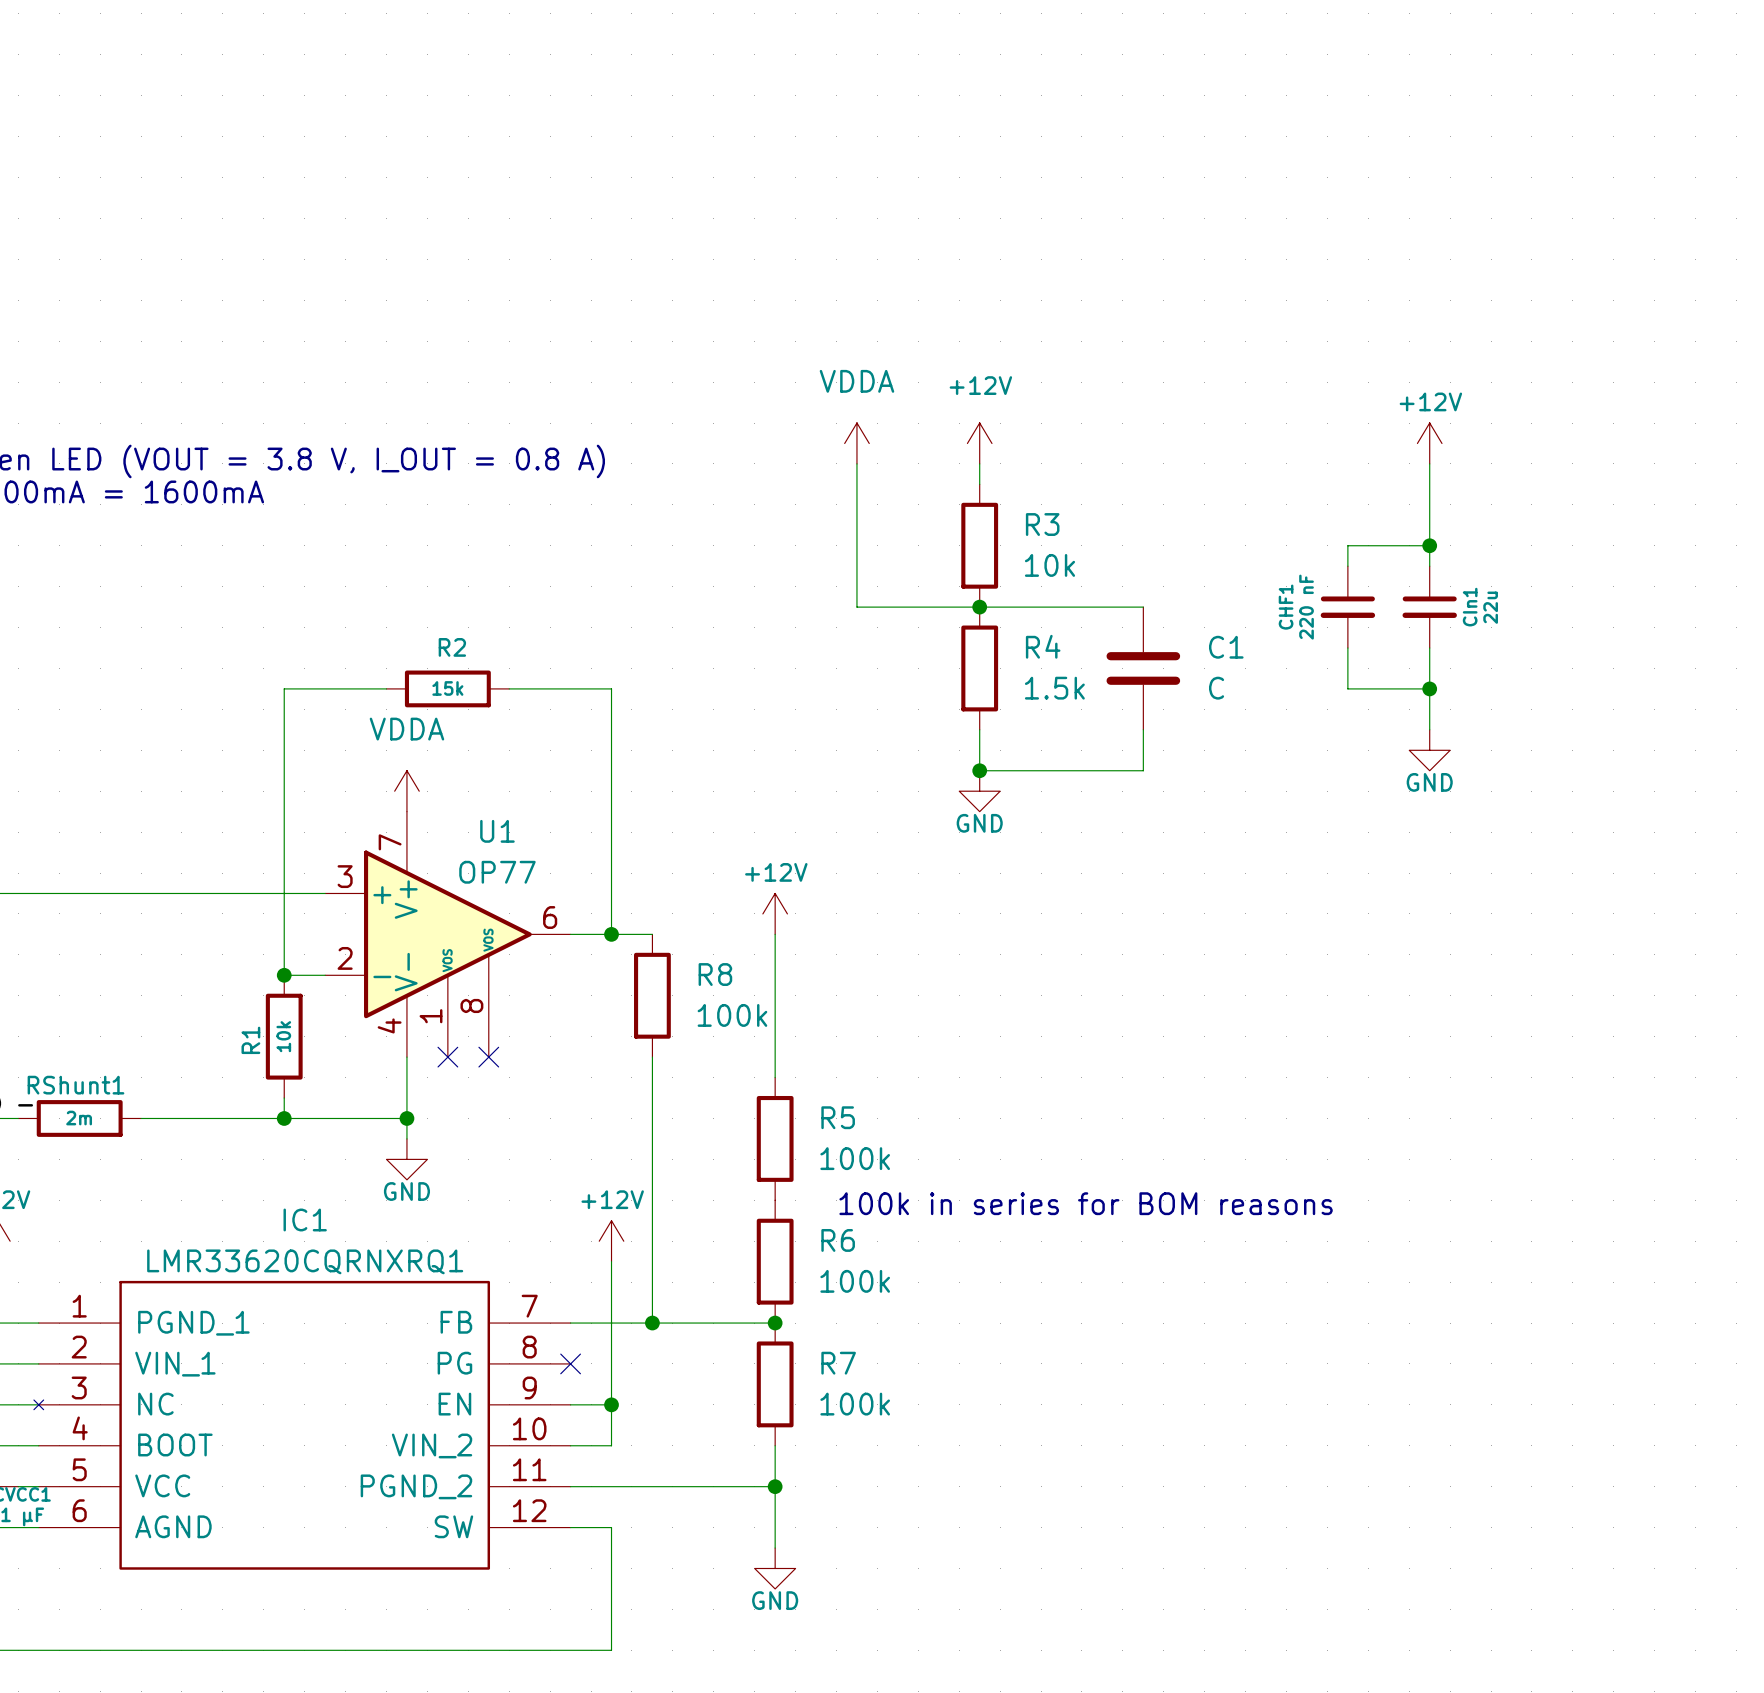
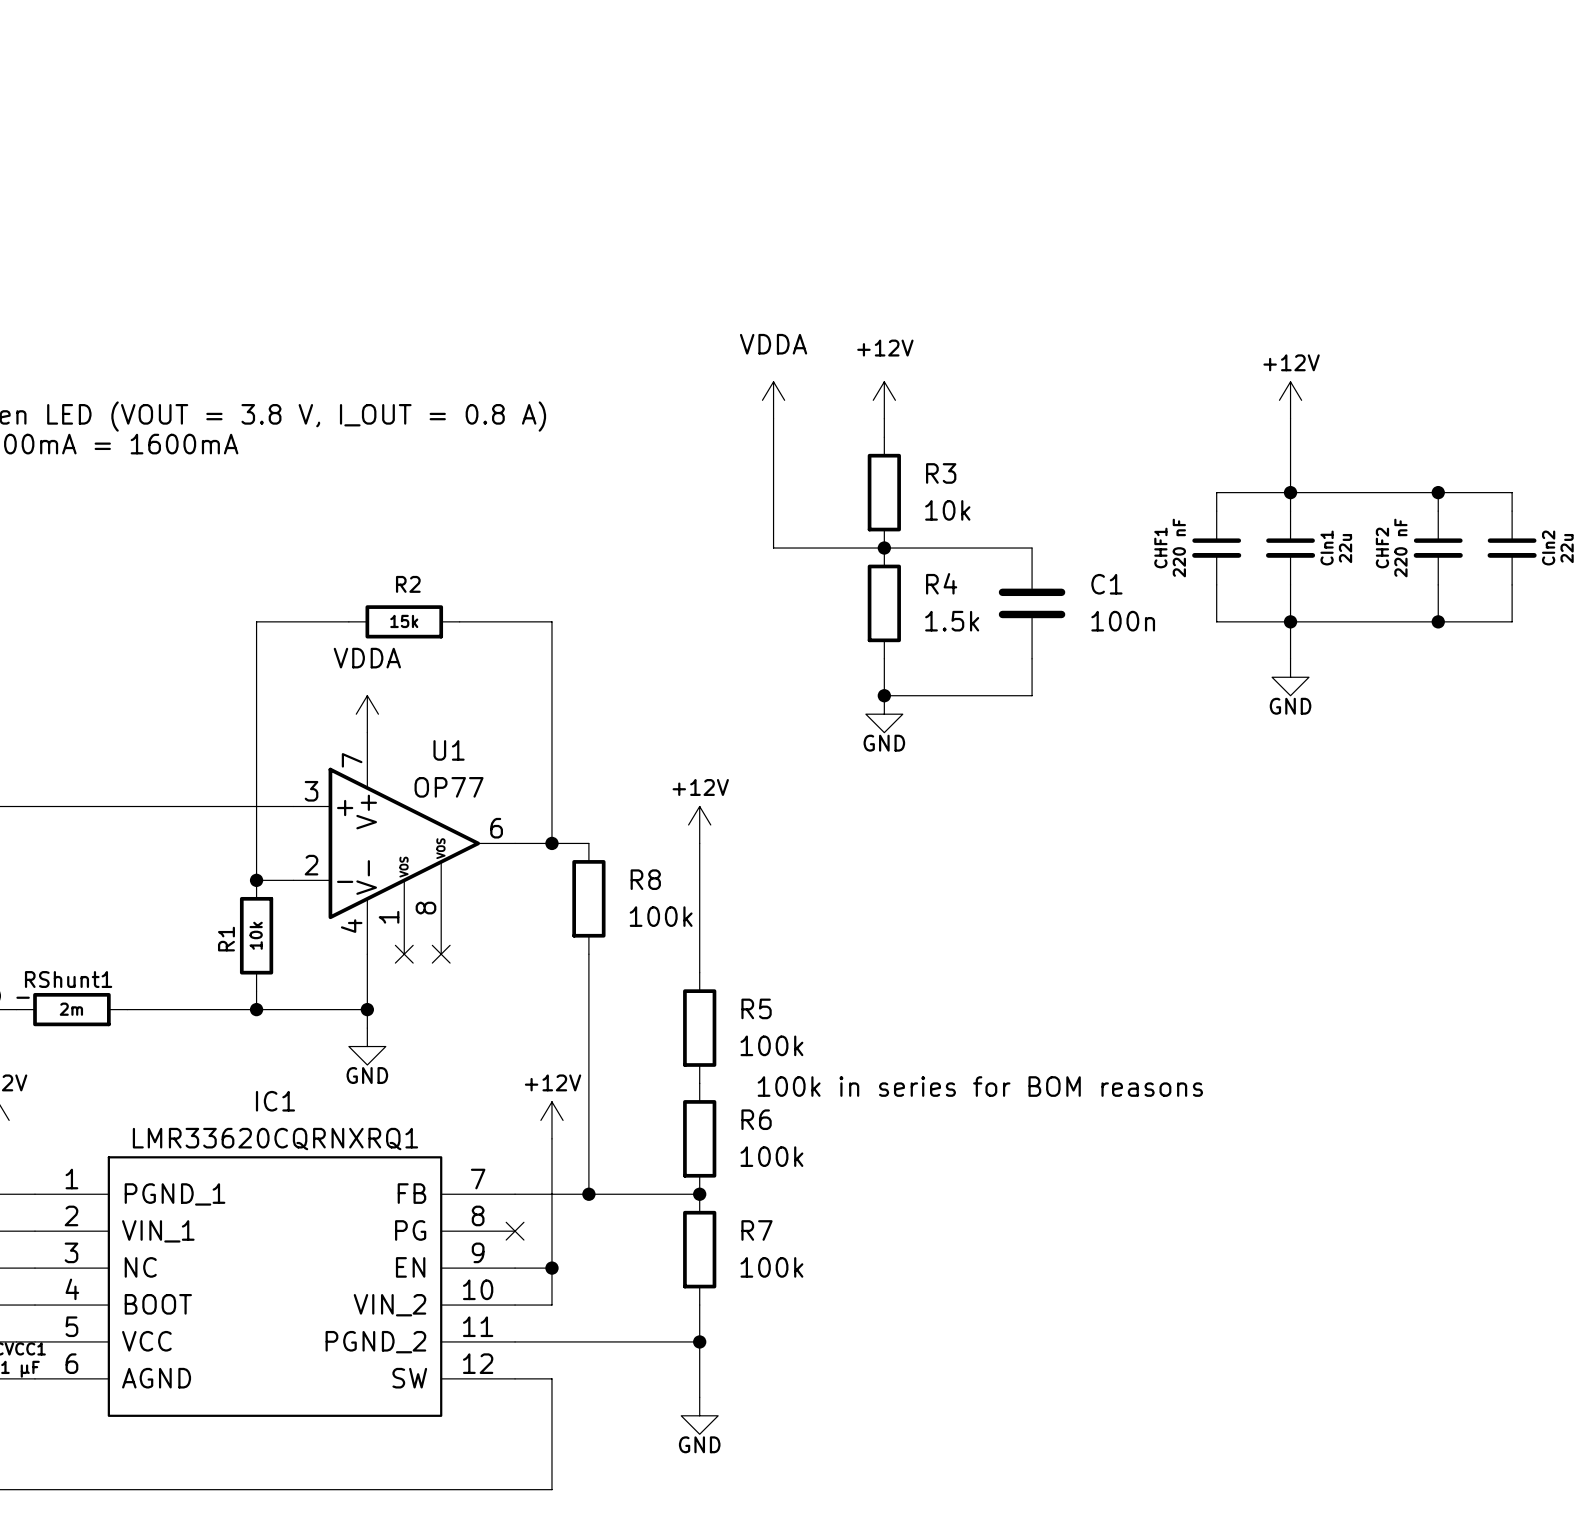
wire: none -> (1290, 492) (1512, 492) (1512, 511)
wire: none -> (1438, 492) (1438, 511)
junction: none -> (1438, 492)
CHF2: none -> 220 nF (1438, 548)
CIn2: none -> 22u (1512, 548)
wire: none -> (1438, 584) (1438, 621)
wire: none -> (1512, 584) (1512, 621) (1290, 621)
C1 value: C (1216, 688) -> 100n (1123, 621)
junction: none -> (1438, 621)
IC1 symbol: [33, 1280, 571, 1570] -> [35, 1156, 516, 1417]

